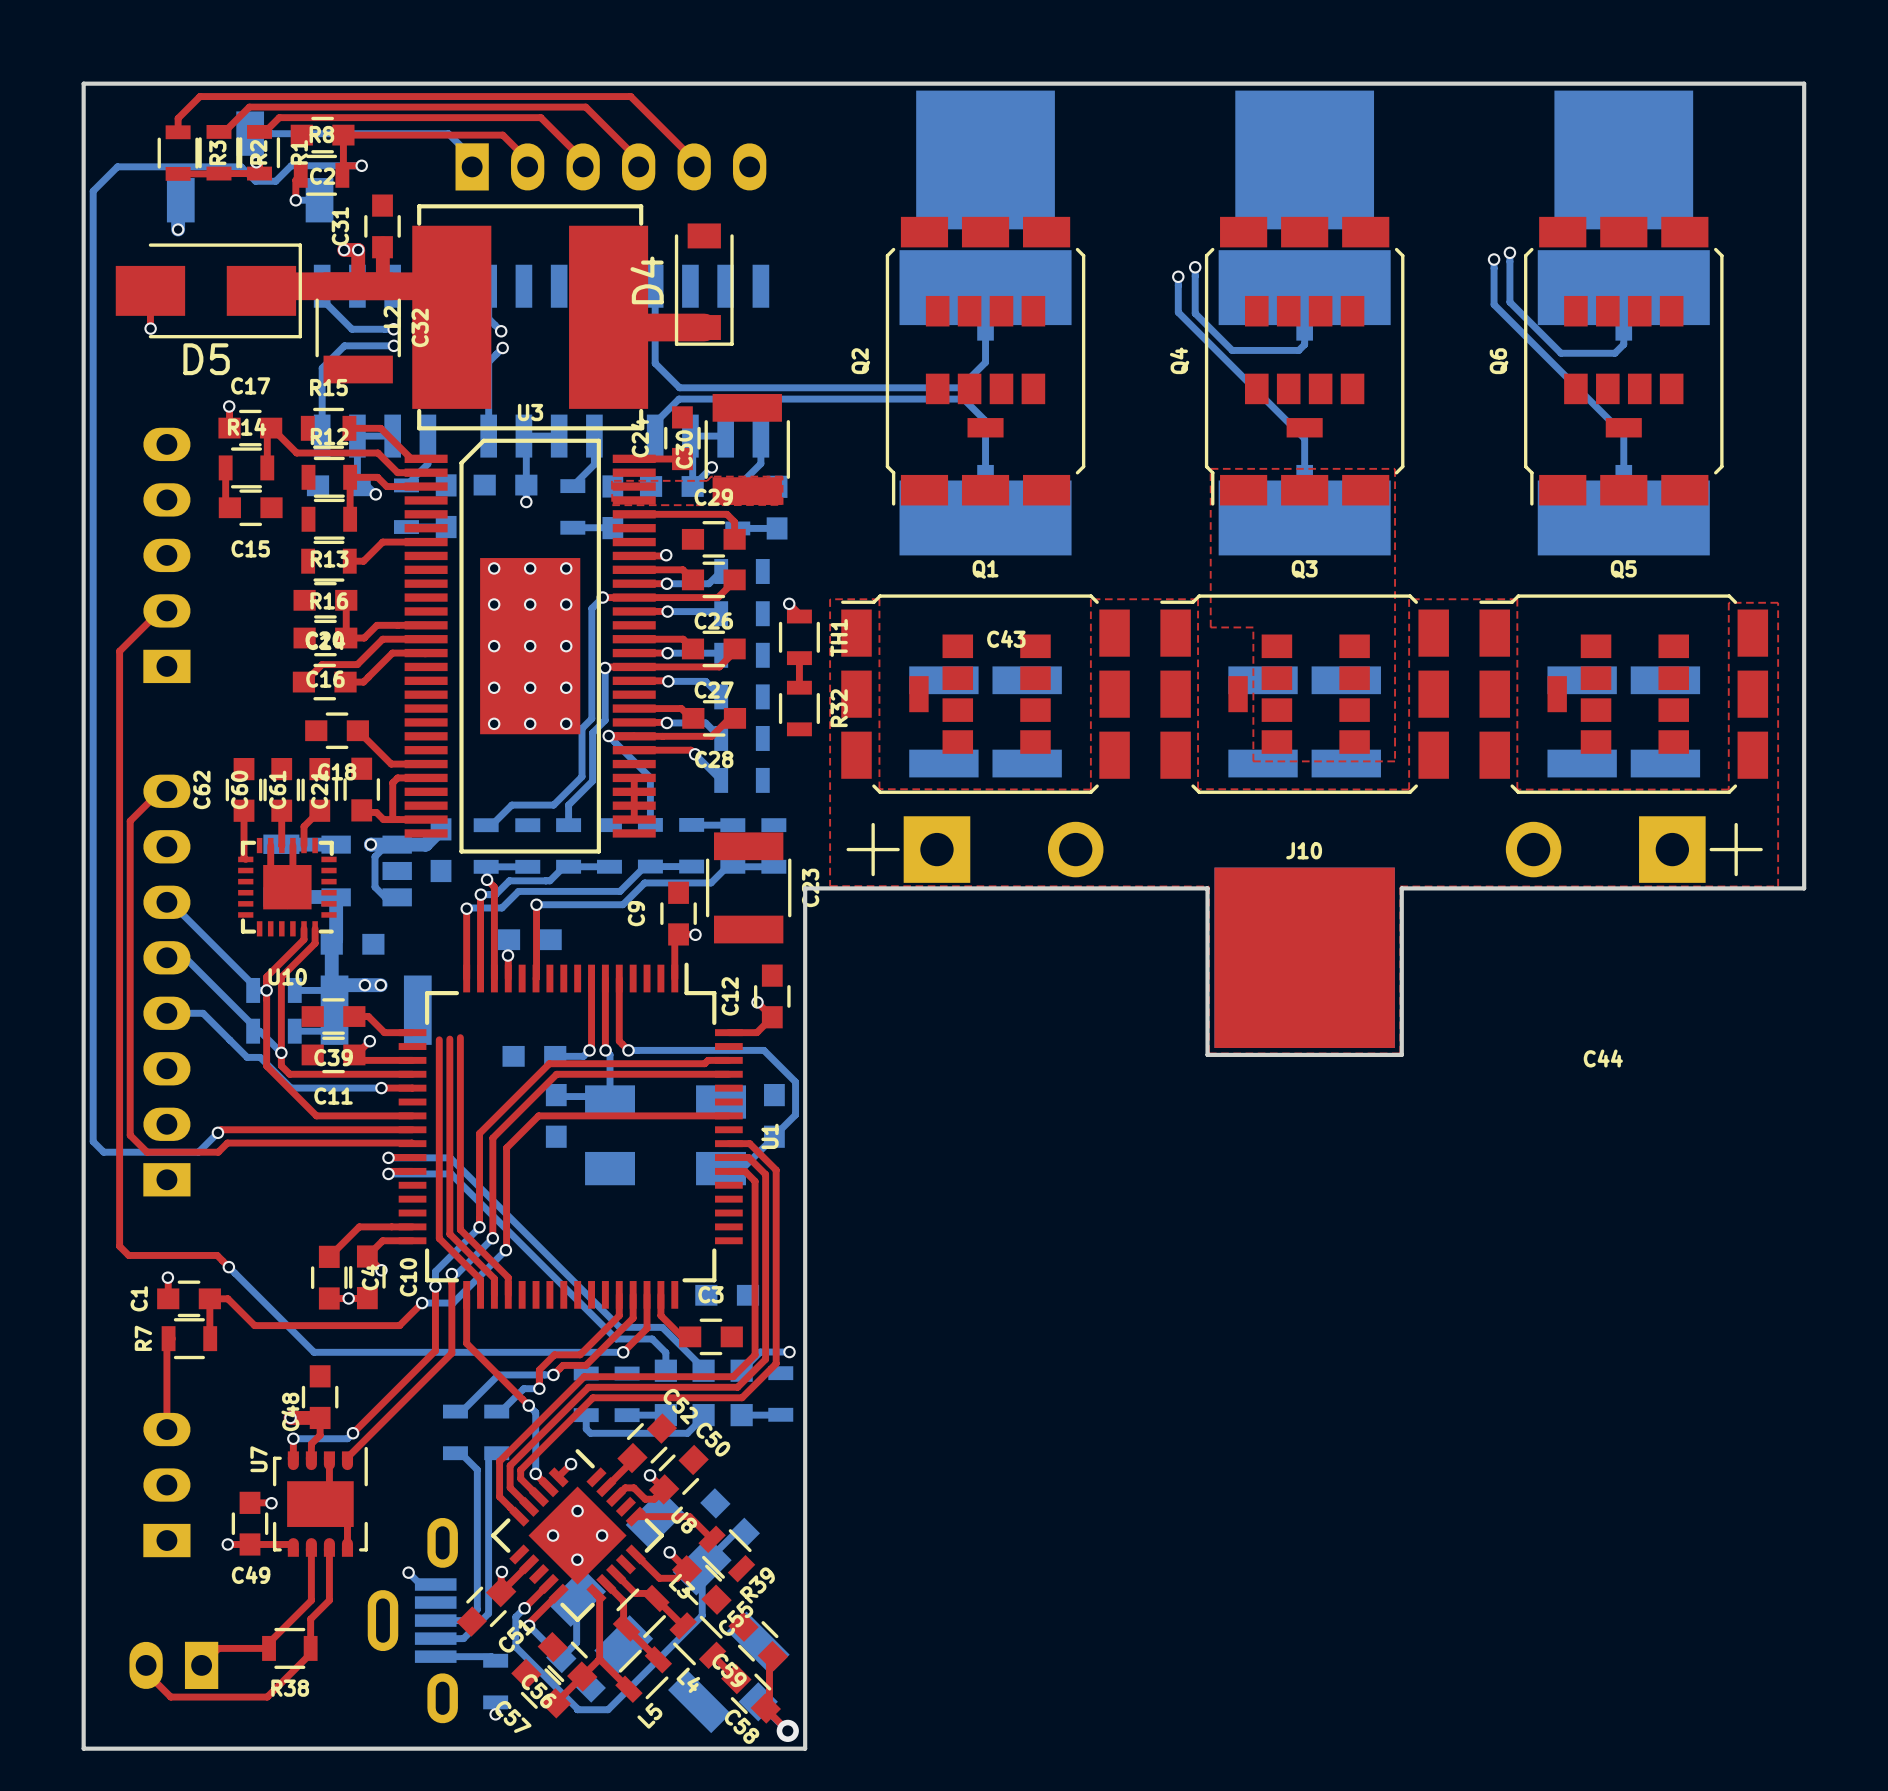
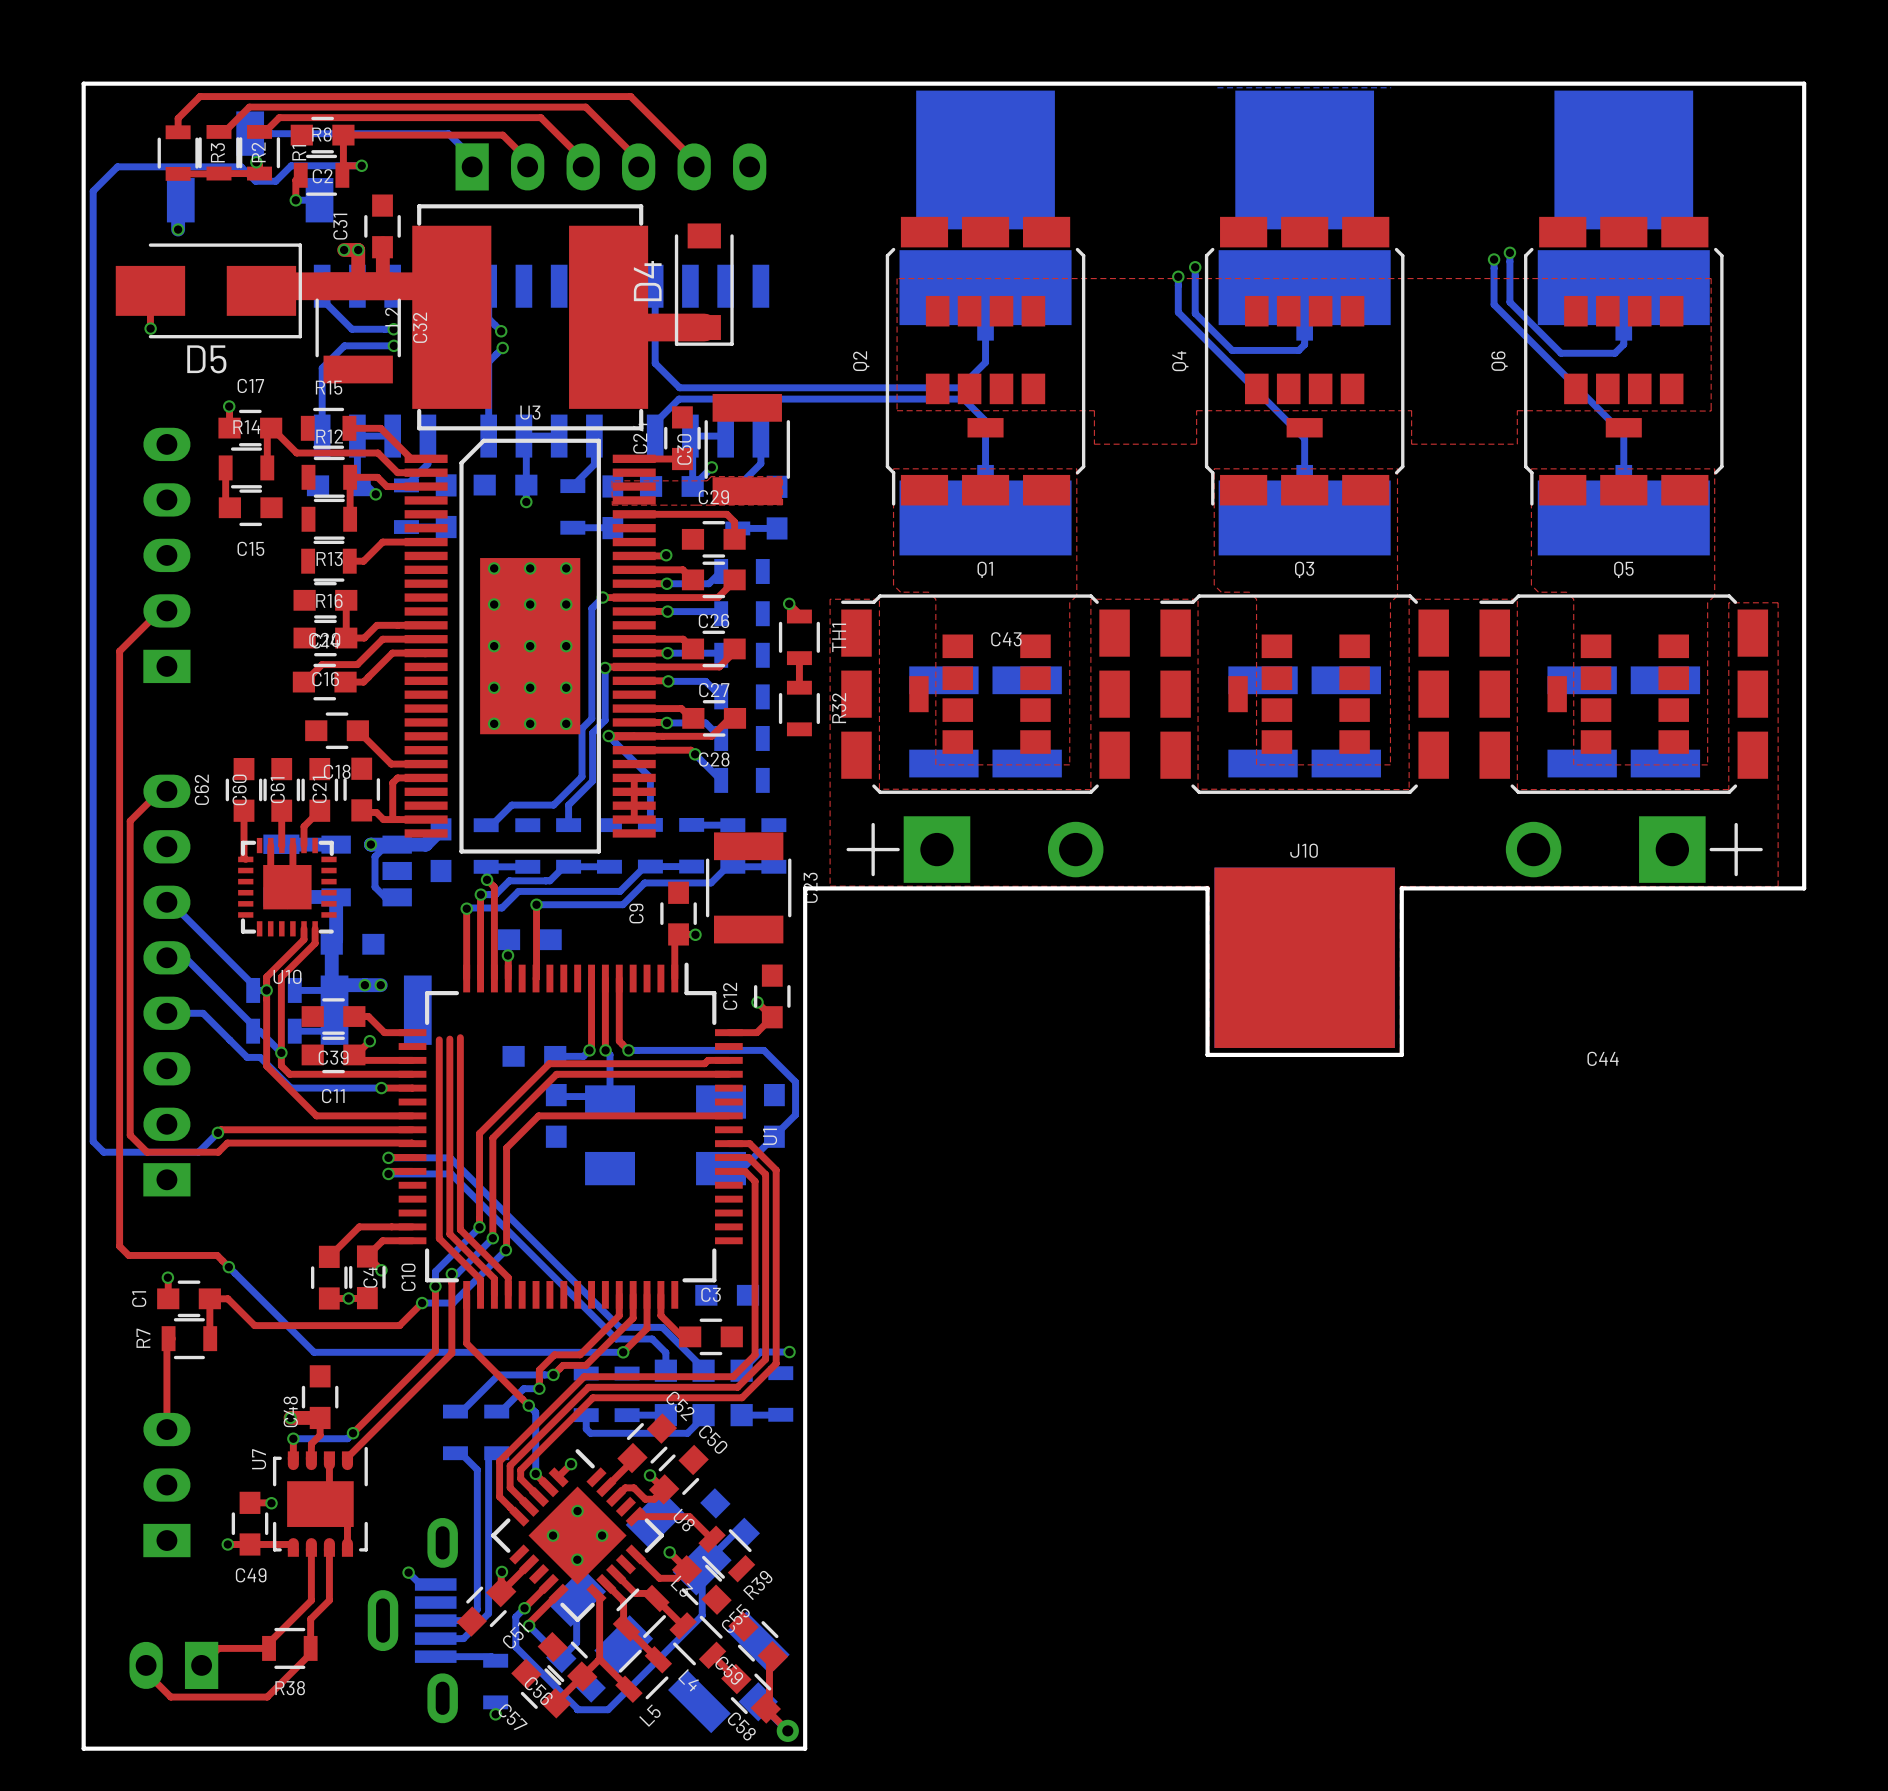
bottom zone outline: none -> (1217, 87) (1391, 87)
top zone outline: none -> (897, 278) (1711, 278) (1711, 411) (1517, 410) (1517, 444) (1411, 444) (1411, 410) (1196, 410) (1196, 444) (1094, 444) (1094, 410) (897, 410) (897, 278)
top zone outline: none -> (893, 468) (893, 585) (900, 592) (928, 592) (935, 599) (935, 764) (1069, 764) (1069, 602) (1076, 595) (1076, 468) (893, 468)
top zone outline: (1210, 468) (1210, 627) (1253, 627) (1253, 761) (1395, 761) (1395, 468) (1210, 468) -> (1214, 468) (1214, 585) (1221, 592) (1249, 592) (1256, 599) (1256, 764) (1390, 764) (1390, 602) (1397, 595) (1397, 468) (1214, 468)
top zone outline: none -> (1531, 468) (1531, 585) (1538, 592) (1566, 592) (1573, 599) (1573, 764) (1707, 764) (1707, 602) (1714, 595) (1714, 468) (1531, 468)

